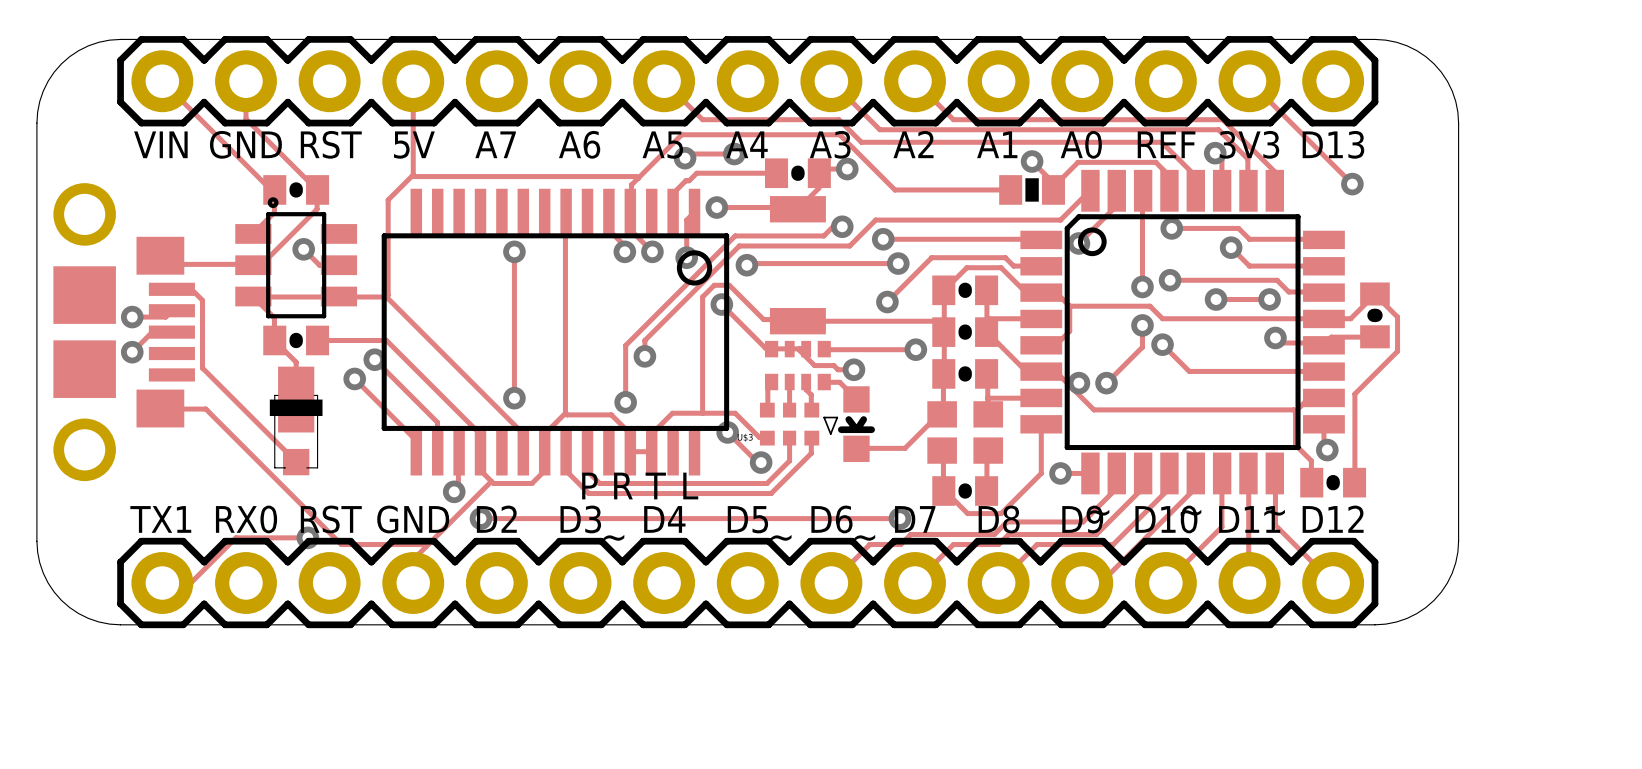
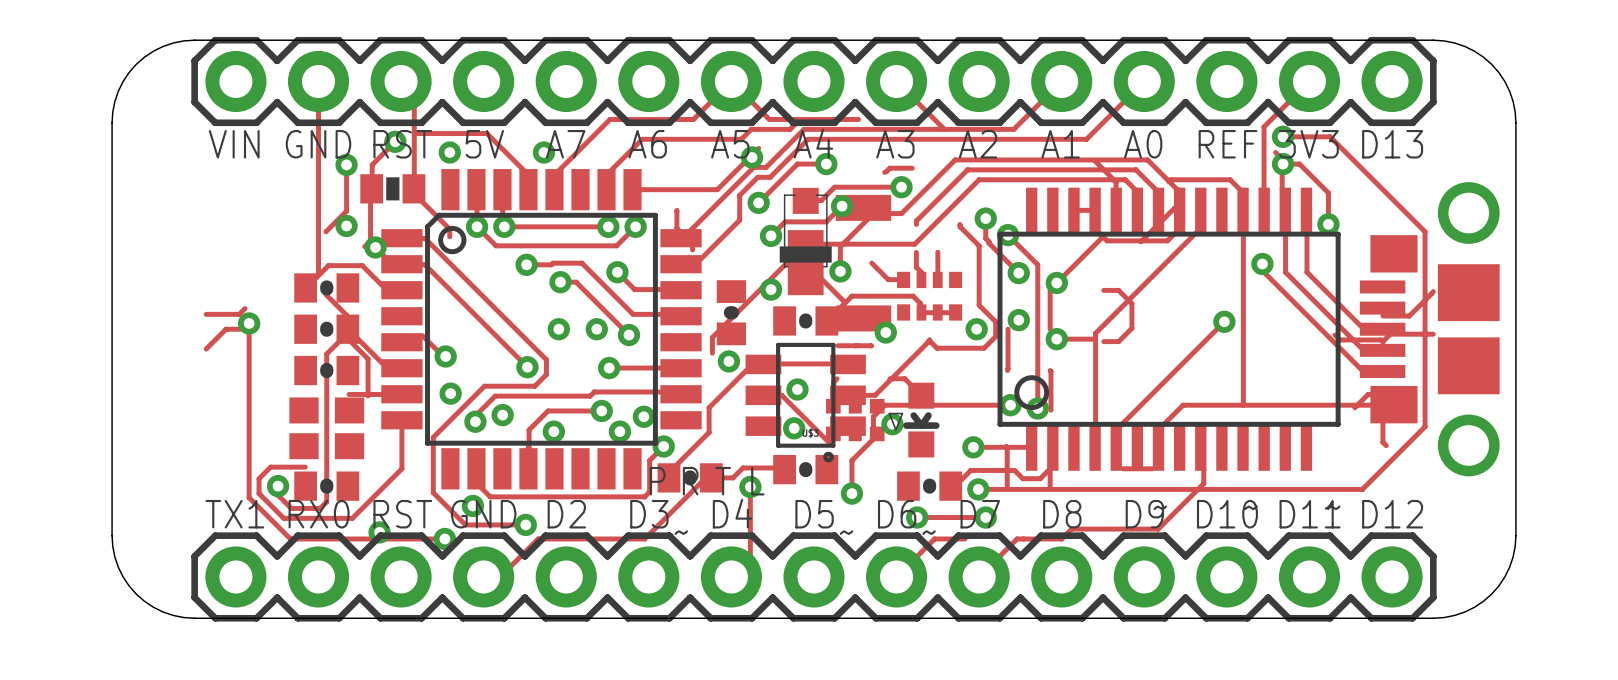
track: (162, 81) (269, 188) (274, 189) -> (346, 164) (346, 188)
track: none -> (401, 81) (414, 94) (414, 188)
track: (413, 81) (413, 174) -> none
track: none -> (731, 81) (693, 119) (610, 119) (554, 174) (554, 189)
track: (915, 81) (953, 119) (1222, 119) (1274, 171) (1274, 190) -> none
track: none -> (1144, 81) (1086, 139) (808, 139) (770, 177) (757, 177) (739, 195) (739, 220) (695, 263) (681, 263)
track: (1249, 81) (1352, 184) -> (1309, 81) (1264, 126) (1264, 210)
track: (245, 118) (317, 189) -> (318, 118) (318, 272) (320, 273)
track: none -> (799, 119) (790, 129) (751, 129) (741, 139) (642, 139) (606, 174) (606, 189)
track: (792, 119) (838, 119) (861, 142) (1161, 142) (1195, 175) (1195, 190) -> none
track: none -> (944, 129) (804, 129) (766, 167) (753, 167) (683, 237) (681, 237)
track: (950, 129) (1218, 129) (1247, 159) (1247, 190) -> (1013, 129) (1061, 81)
track: none -> (414, 133) (486, 133) (528, 174) (528, 189)
track: none -> (1283, 136) (1330, 136) (1425, 231) (1425, 426) (1362, 489) (978, 489)
via: none -> (1283, 136)
track: none -> (395, 141) (372, 164) (372, 188)
via: none -> (395, 141)
track: none -> (758, 148) (717, 189) (632, 189)
via: none -> (449, 152)
via: none -> (543, 152)
track: (734, 153) (689, 153) (685, 158) -> none
via position: (734, 153) -> (826, 164)
via: (1215, 153) -> none
via: (1032, 161) -> none
track: none -> (826, 164) (797, 164) (758, 202)
track: none -> (1283, 164) (1299, 164) (1328, 192) (1328, 224)
via: none -> (1283, 164)
via: none -> (346, 164)
via position: (847, 169) -> (901, 187)
track: (776, 173) (696, 173) (673, 193) (673, 211) -> none
part: (797, 173) -> none
track: (818, 173) (818, 188) (797, 209) (796, 207) (716, 207) -> none
track: (413, 174) (388, 199) (388, 295) (386, 297) -> none
track: (413, 174) (414, 176) (636, 176) (638, 178) -> none
part footprint: [263, 175, 330, 205] -> [360, 174, 426, 204]
track: none -> (1169, 181) (1170, 179) (1230, 179) (1242, 192) (1242, 210)
via: (1352, 184) -> none
track: none -> (901, 187) (834, 187) (821, 200) (805, 200)
track: none -> (371, 188) (370, 240) (364, 246)
track: (317, 189) (317, 209) (261, 265) (169, 264) (160, 256) -> none
track: none -> (413, 188) (415, 195) (449, 229) (449, 236)
track: (1010, 189) (894, 189) (839, 134) (681, 134) (631, 184) (630, 230) (652, 251) -> none
part: (1032, 189) -> none
track: (1053, 189) (1053, 186) (1078, 162) (1155, 162) (1169, 175) (1169, 190) -> none
track: none -> (477, 189) (477, 226) (496, 245) (616, 245) (635, 226)
track: none -> (502, 189) (502, 225) (504, 226) (608, 226)
track: (1089, 190) (1060, 220) (875, 220) -> (1136, 210) (1136, 191) (1125, 179) (979, 179) (940, 218)
track: (1142, 190) (1142, 286) -> none
via: none -> (758, 202)
via: (716, 207) -> none
track: none -> (842, 206) (826, 221) (785, 221) (771, 235)
via: none -> (842, 206)
track: (566, 211) (565, 413) -> none
track: (694, 211) (686, 220) (686, 257) -> none
track: none -> (1074, 210) (1094, 210)
track: none -> (1095, 210) (1095, 229) (1107, 240) (1167, 240) (1178, 229) (1178, 191) (1147, 159) (955, 159) (901, 213) (871, 213)
track: none -> (1158, 210) (1158, 192) (1136, 169) (967, 169) (916, 221) (916, 224)
track: none -> (1200, 210) (1200, 228) (1095, 333) (1095, 448)
track: none -> (1243, 210) (1243, 405)
track: none -> (1285, 210) (1285, 272) (1363, 349) (1382, 350)
track: none -> (1306, 210) (1306, 272) (1363, 329) (1382, 329)
track: none -> (871, 214) (840, 246) (840, 271)
track: none -> (985, 218) (985, 238) (1018, 273)
via: none -> (985, 218)
via: none -> (1328, 224)
track: (842, 226) (833, 226) (823, 235) (735, 235) (625, 345) (625, 402) -> none
via: (842, 226) -> none
track: none -> (959, 224) (979, 245) (979, 305) (995, 321) (995, 336) (984, 348) (937, 348) (929, 340) (875, 395) (847, 395)
via: none -> (346, 226)
via: none -> (477, 226)
via: none -> (504, 226)
via: none -> (608, 226)
via: none -> (635, 226)
track: (1171, 228) (1238, 228) (1249, 239) (1323, 239) -> none
via: (1171, 228) -> none
track: none -> (1008, 235) (1037, 264) (1037, 408)
via: none -> (1008, 235)
track: (883, 239) (1041, 239) -> (1056, 282) (1103, 236)
via: (883, 239) -> none
track: none -> (401, 238) (425, 238) (546, 359) (546, 374) (534, 386) (484, 386) (433, 437) (433, 492) (465, 524) (525, 524)
via: (1078, 243) -> none
track: (1231, 247) (1249, 266) (1323, 266) -> none
via: (1231, 247) -> none
track: (514, 251) (514, 398) -> none
via: (514, 251) -> none
via: (624, 251) -> none
via: (652, 251) -> none
track: none -> (916, 252) (916, 267) (921, 272) (921, 279)
part rotation: 0° (296, 257) -> 180° (805, 402)
part position: (296, 257) -> (805, 402)
via position: (686, 257) -> (771, 235)
track: (898, 263) (748, 263) (746, 265) -> none
via: (898, 263) -> none
track: none -> (805, 263) (845, 302)
via: (746, 265) -> none
track: none -> (871, 263) (888, 279) (903, 279)
track: none -> (401, 264) (425, 264) (527, 367)
track: none -> (526, 264) (581, 263) (633, 314) (679, 314) (681, 316)
via: none -> (526, 264)
track: (1041, 266) (1013, 266) (1005, 257) (931, 257) (887, 302) -> none
track: none -> (1262, 263) (1262, 270) (1363, 371) (1382, 371)
via: none -> (1262, 263)
via: none -> (840, 271)
track: none -> (617, 272) (634, 289) (681, 289)
via: none -> (617, 272)
via: none -> (1018, 273)
track: (1170, 280) (1277, 280) (1288, 291) (1323, 291) -> none
via: (1170, 280) -> none
part footprint: [1360, 282, 1390, 349] -> [1359, 182, 1500, 477]
track: none -> (560, 282) (576, 282) (629, 335)
via: none -> (560, 282)
via: none -> (1056, 282)
via: (1142, 286) -> none
track: (172, 289) (191, 289) (202, 300) (202, 368) (296, 461) -> none
part: none -> (326, 287)
track: (943, 290) (966, 267) (1001, 267) (1024, 291) (1041, 292) -> (305, 287) (328, 265) (362, 265) (385, 288) (401, 290)
track: (944, 290) (943, 332) (942, 321) (763, 319) (729, 285) (714, 285) (702, 297) (702, 413) -> none
part: (965, 290) -> none
track: (1374, 294) (1397, 317) (1397, 351) (1354, 394) (1354, 482) -> none
track: (253, 296) (338, 297) -> none
track: (338, 296) (386, 297) -> none
track: (386, 297) (522, 433) (523, 452) -> none
track: (1216, 299) (1269, 299) -> none
via: (1216, 299) -> none
via: (1269, 299) -> none
via: (887, 302) -> none
track: (721, 304) (765, 348) (771, 349) -> none
via position: (721, 304) -> (771, 289)
track: (1069, 306) (1150, 306) (1162, 318) (1323, 318) -> none
part: none -> (731, 312)
track: none -> (955, 312) (921, 312) (920, 303) (913, 296) (851, 296) (827, 320)
via: (132, 317) -> none
track: (1041, 318) (988, 318) (986, 332) (1026, 371) (1041, 371) -> none
via: none -> (1018, 320)
part: none -> (805, 320)
track: none -> (1224, 321) (1117, 429) (1116, 448)
via: none -> (1224, 321)
track: (1142, 325) (1142, 347) (1106, 383) -> none
via: (1142, 325) -> none
via: none -> (249, 323)
part: (124, 332) -> none
part: none -> (326, 329)
via: none -> (558, 329)
via: none -> (596, 329)
part rotation: 0° (555, 332) -> 180° (1169, 329)
part position: (555, 332) -> (1169, 329)
part: (965, 332) -> none
part position: (1182, 332) -> (541, 329)
via: none -> (885, 332)
via: none -> (629, 335)
via: (1275, 337) -> none
track: none -> (422, 335) (439, 352)
part: (296, 340) -> none
track: (317, 340) (386, 340) (480, 434) (481, 471) (493, 483) (532, 483) (544, 470) (545, 433) (565, 413) -> none
track: none -> (1056, 339) (1095, 339)
via: none -> (1056, 339)
track: (1162, 344) (1189, 371) (1323, 371) -> none
via: (1162, 344) -> none
track: (799, 348) (814, 365) (833, 365) (838, 369) (853, 369) -> none
track: (824, 349) (915, 349) -> none
via position: (915, 349) -> (976, 329)
via: (132, 352) -> none
via position: (644, 356) -> (728, 361)
track: (374, 359) (437, 422) (437, 452) -> none
part position: (797, 365) -> (929, 296)
track: none -> (847, 364) (752, 364) (709, 407) (709, 432) (669, 472) (669, 477)
via: (853, 369) -> none
via: none -> (527, 367)
track: none -> (401, 368) (387, 368) (347, 329) (348, 332) (326, 354) (326, 501) (320, 508) (291, 508) (278, 495) (278, 486)
track: none -> (609, 368) (681, 368)
via: none -> (609, 368)
track: (1041, 371) (1057, 373) (1093, 409) (1293, 409) (1295, 411) (1295, 445) (1311, 460) (1311, 482) -> none
part: none -> (326, 370)
track: (943, 373) (943, 412) (938, 414) (904, 448) (856, 448) -> none
part: (965, 373) -> none
track: (354, 378) (415, 440) (416, 452) -> none
via position: (354, 378) -> (450, 393)
track: (789, 382) (789, 410) -> (937, 252) (937, 279)
track: (806, 382) (806, 389) (811, 394) (811, 409) -> none
via: (1078, 383) -> none
via: (1106, 383) -> none
via: none -> (797, 389)
track: none -> (681, 394) (680, 391) (594, 391) (590, 396) (495, 396) (475, 415) (475, 421)
via position: (514, 398) -> (601, 410)
track: (987, 398) (1041, 398) -> (349, 394) (401, 394)
track: none -> (763, 395) (781, 395) (830, 444)
via: (625, 402) -> none
track: (160, 409) (205, 409) (341, 544) -> (249, 323) (249, 497) (290, 538) (412, 538)
track: none -> (1010, 405) (885, 405) (873, 416) (873, 439) (851, 460) (851, 493)
via: none -> (1010, 405)
track: none -> (1393, 405) (1183, 405) (1159, 429) (1158, 448)
via: none -> (1037, 408)
track: (565, 413) (567, 414) (611, 414) (630, 434) (630, 452) (651, 452) (652, 433) (672, 413) (735, 413) (759, 437) (767, 438) -> none
track: none -> (601, 410) (548, 410) (529, 429) (529, 468)
via: none -> (502, 415)
part rotation: 0° (296, 420) -> 180° (805, 241)
part position: (296, 420) -> (805, 241)
via: none -> (643, 416)
track: none -> (401, 420) (401, 468) (352, 518) (283, 518) (259, 493) (259, 478) (270, 467) (305, 467)
track: (1041, 424) (1041, 473) (1001, 513) (967, 513) (943, 491) -> none
via: none -> (475, 421)
via: none -> (892, 424)
track: (727, 432) (757, 462) (761, 462) -> none
part position: (965, 432) -> (326, 428)
via: none -> (553, 431)
via: none -> (619, 431)
track: (789, 438) (789, 460) (766, 483) (641, 483) -> (784, 469) (782, 467) (742, 467) (733, 477) (709, 478)
track: (811, 438) (811, 453) (771, 493) (588, 493) (566, 470) (566, 452) -> none
track: none -> (663, 446) (649, 460) (649, 491) (644, 496) (490, 496) (477, 483) (477, 468)
via: none -> (663, 446)
via: (1327, 450) -> none
track: none -> (973, 447) (1031, 448)
via: none -> (973, 447)
track: (588, 452) (588, 471) (599, 483) (637, 483) -> none
track: none -> (1052, 448) (1052, 466) (1040, 478) (1022, 478) (1014, 470) (970, 470) (955, 486) (950, 486)
via: (761, 462) -> none
via: (1060, 473) -> none
track: (1116, 473) (1116, 488) (1083, 521) (1007, 521) (994, 534) (910, 534) (900, 544) -> none
track: (1169, 473) (1169, 488) (1113, 544) (1037, 544) (998, 583) -> none
track: (1195, 473) (1195, 488) (1100, 583) (1082, 583) -> none
track: (1221, 473) (1221, 526) (1165, 583) -> none
track: (1248, 473) (1249, 583) -> none
track: (1275, 473) (1275, 525) (1333, 583) -> none
part: none -> (805, 469)
track: (491, 481) (413, 559) (413, 583) -> (704, 478) (644, 538) (538, 538) (500, 576) (483, 576)
part: none -> (690, 477)
part: (1333, 482) -> none
via: none -> (278, 486)
part: none -> (326, 486)
via: (454, 491) -> none
track: none -> (750, 486) (750, 557) (731, 576)
via: none -> (750, 486)
part: none -> (929, 486)
part: (965, 491) -> none
via: none -> (978, 489)
via: none -> (851, 493)
via: none -> (472, 505)
track: (480, 518) (899, 518) -> none
via: (480, 518) -> none
via position: (899, 518) -> (985, 517)
track: none -> (917, 517) (985, 517)
via: none -> (917, 517)
via: none -> (525, 524)
track: (307, 537) (235, 537) (190, 583) (162, 583) -> none
track: (373, 544) (424, 544) (426, 546) -> none
via: none -> (444, 538)

